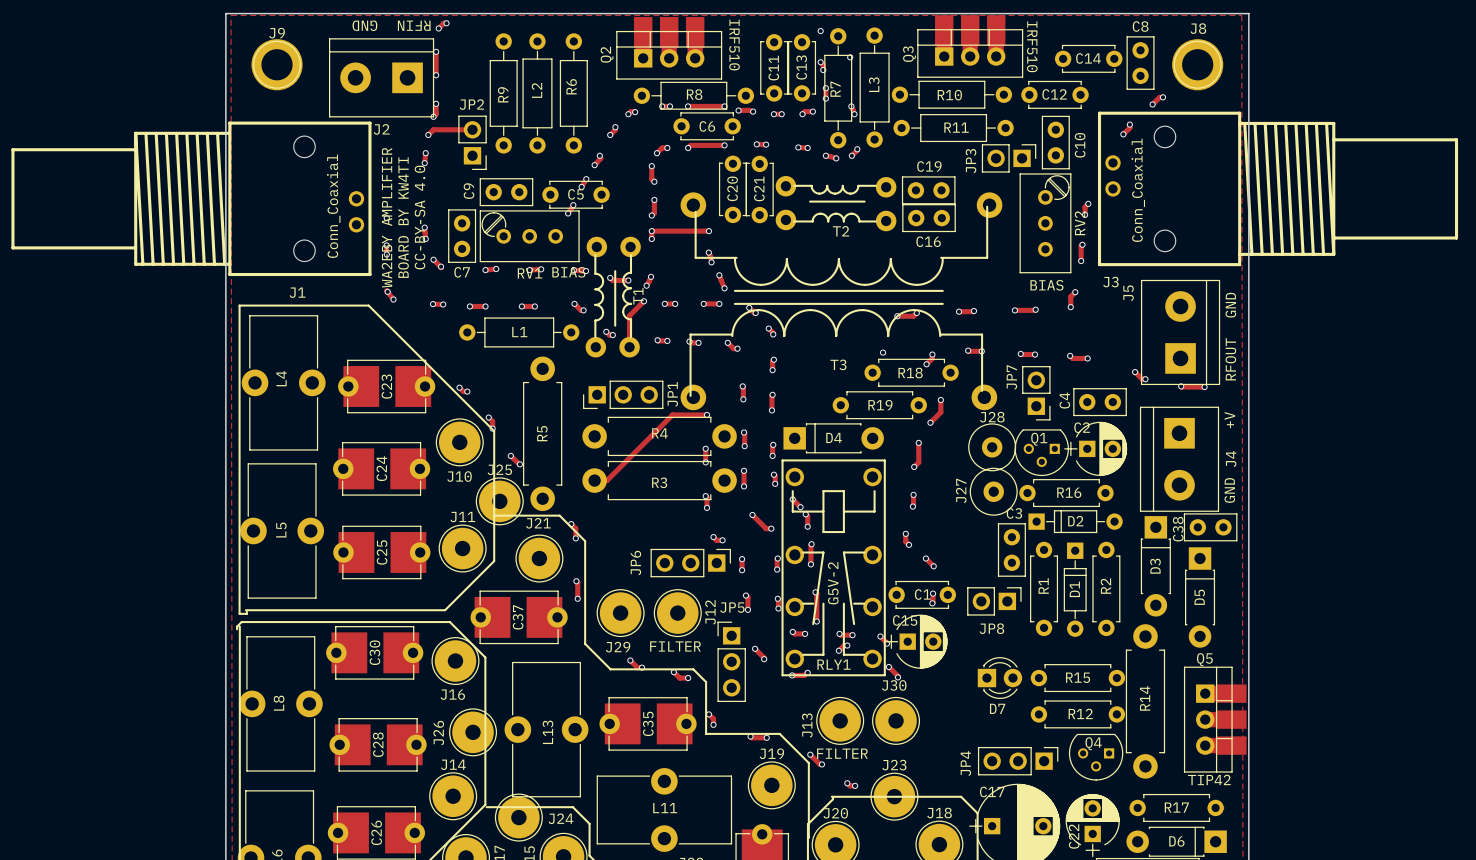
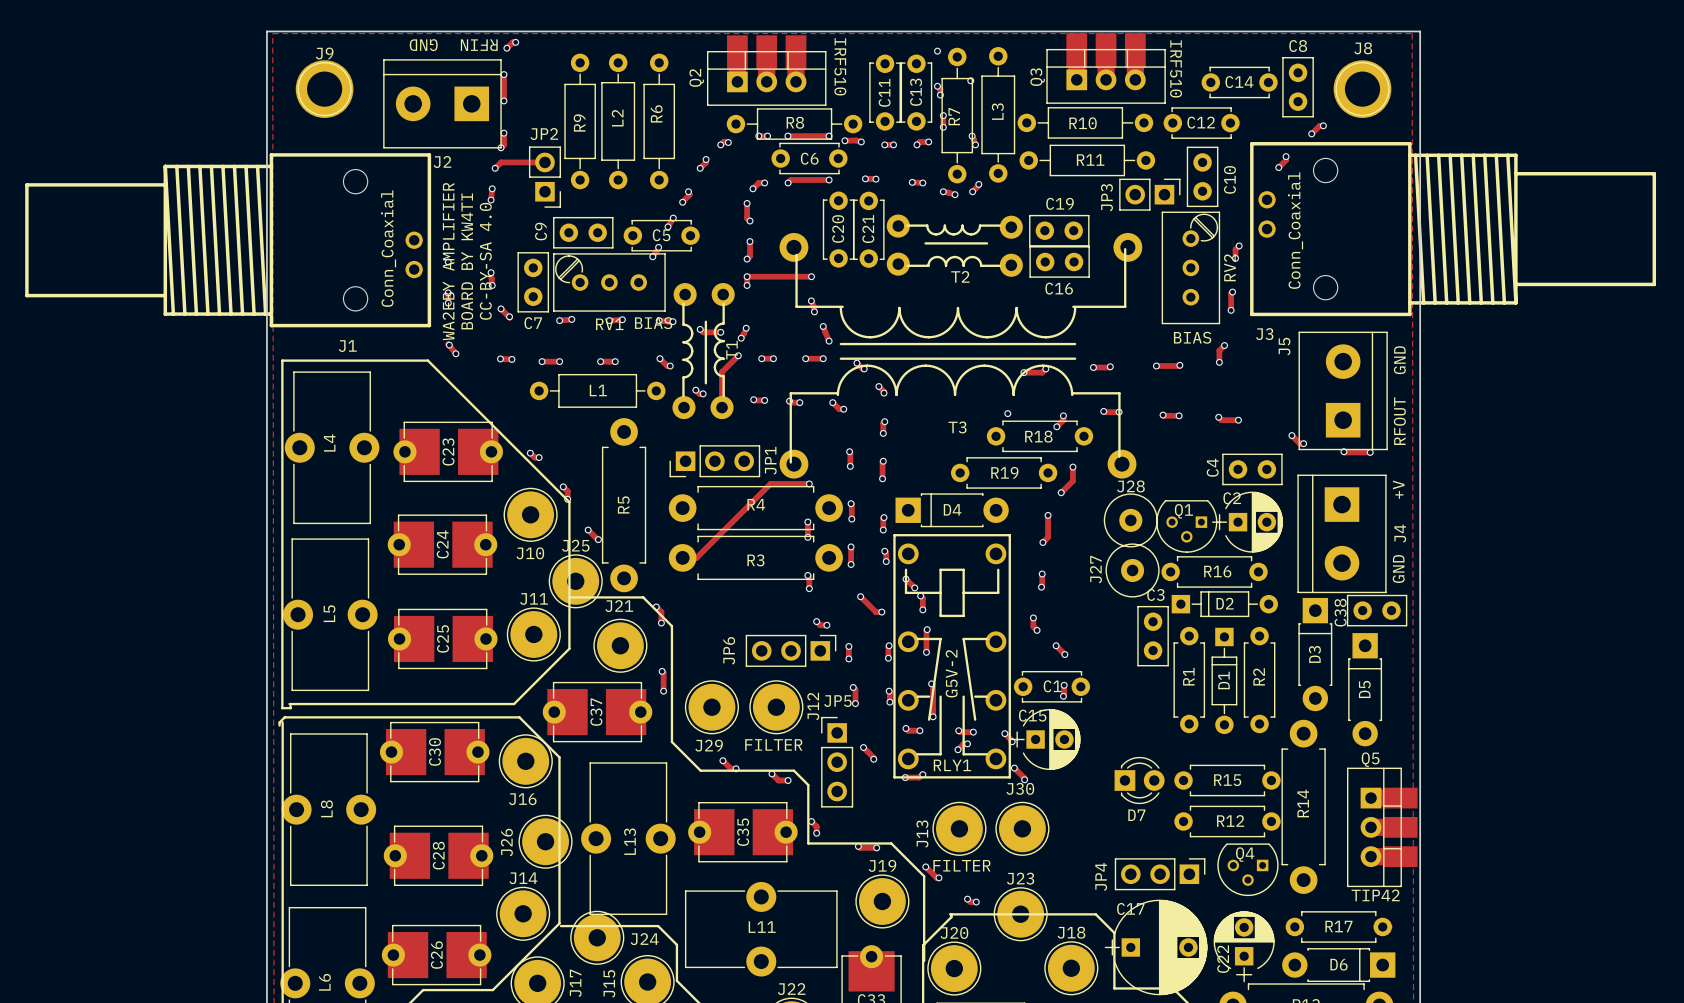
JP7: (1036, 393) -> none
JP8: (994, 601) -> none

